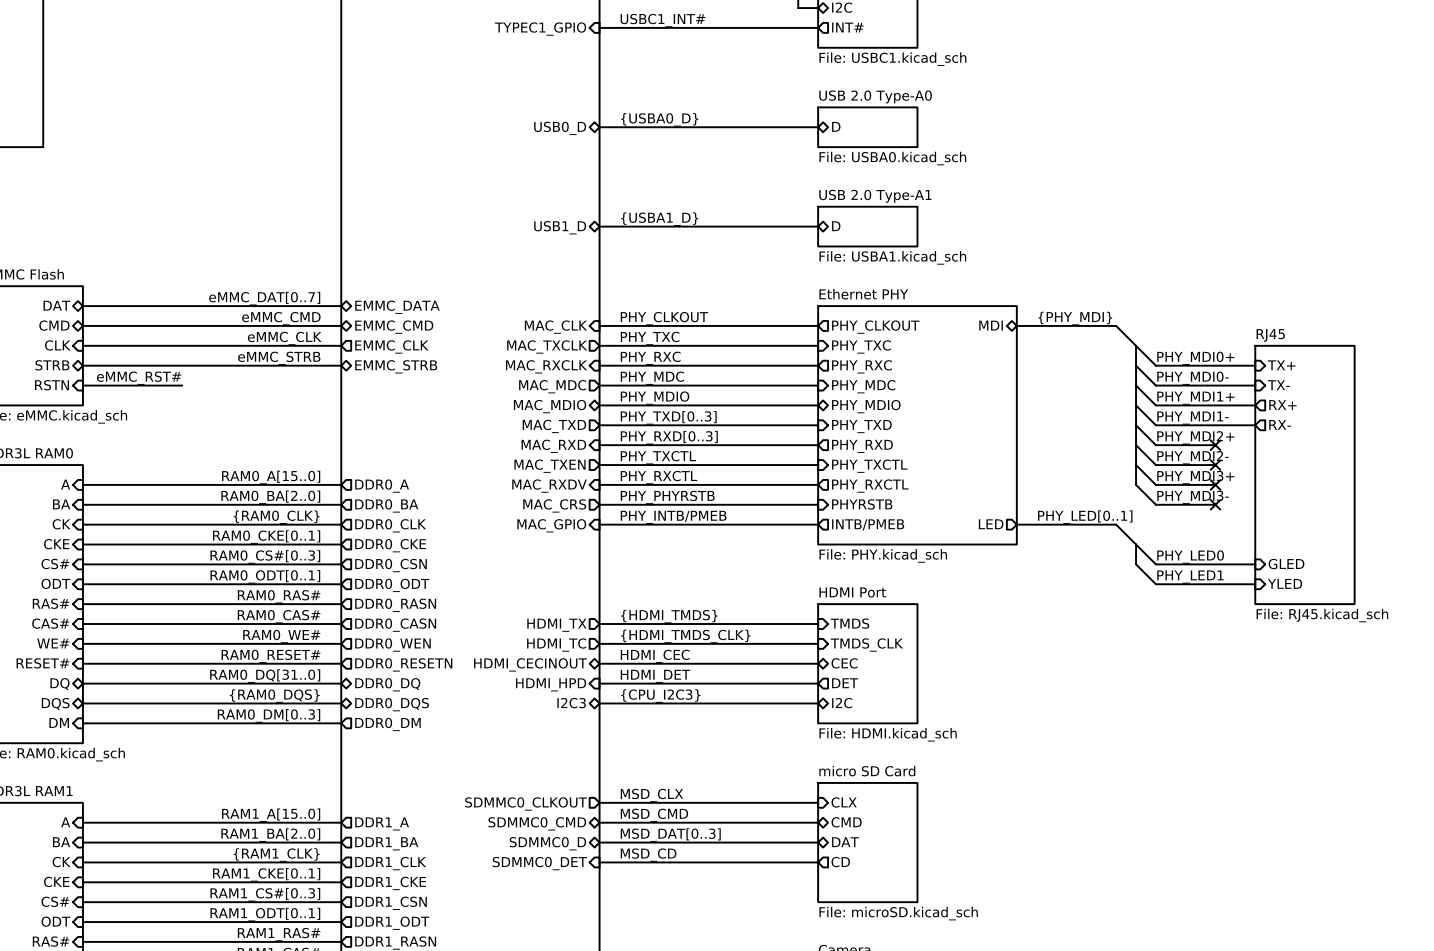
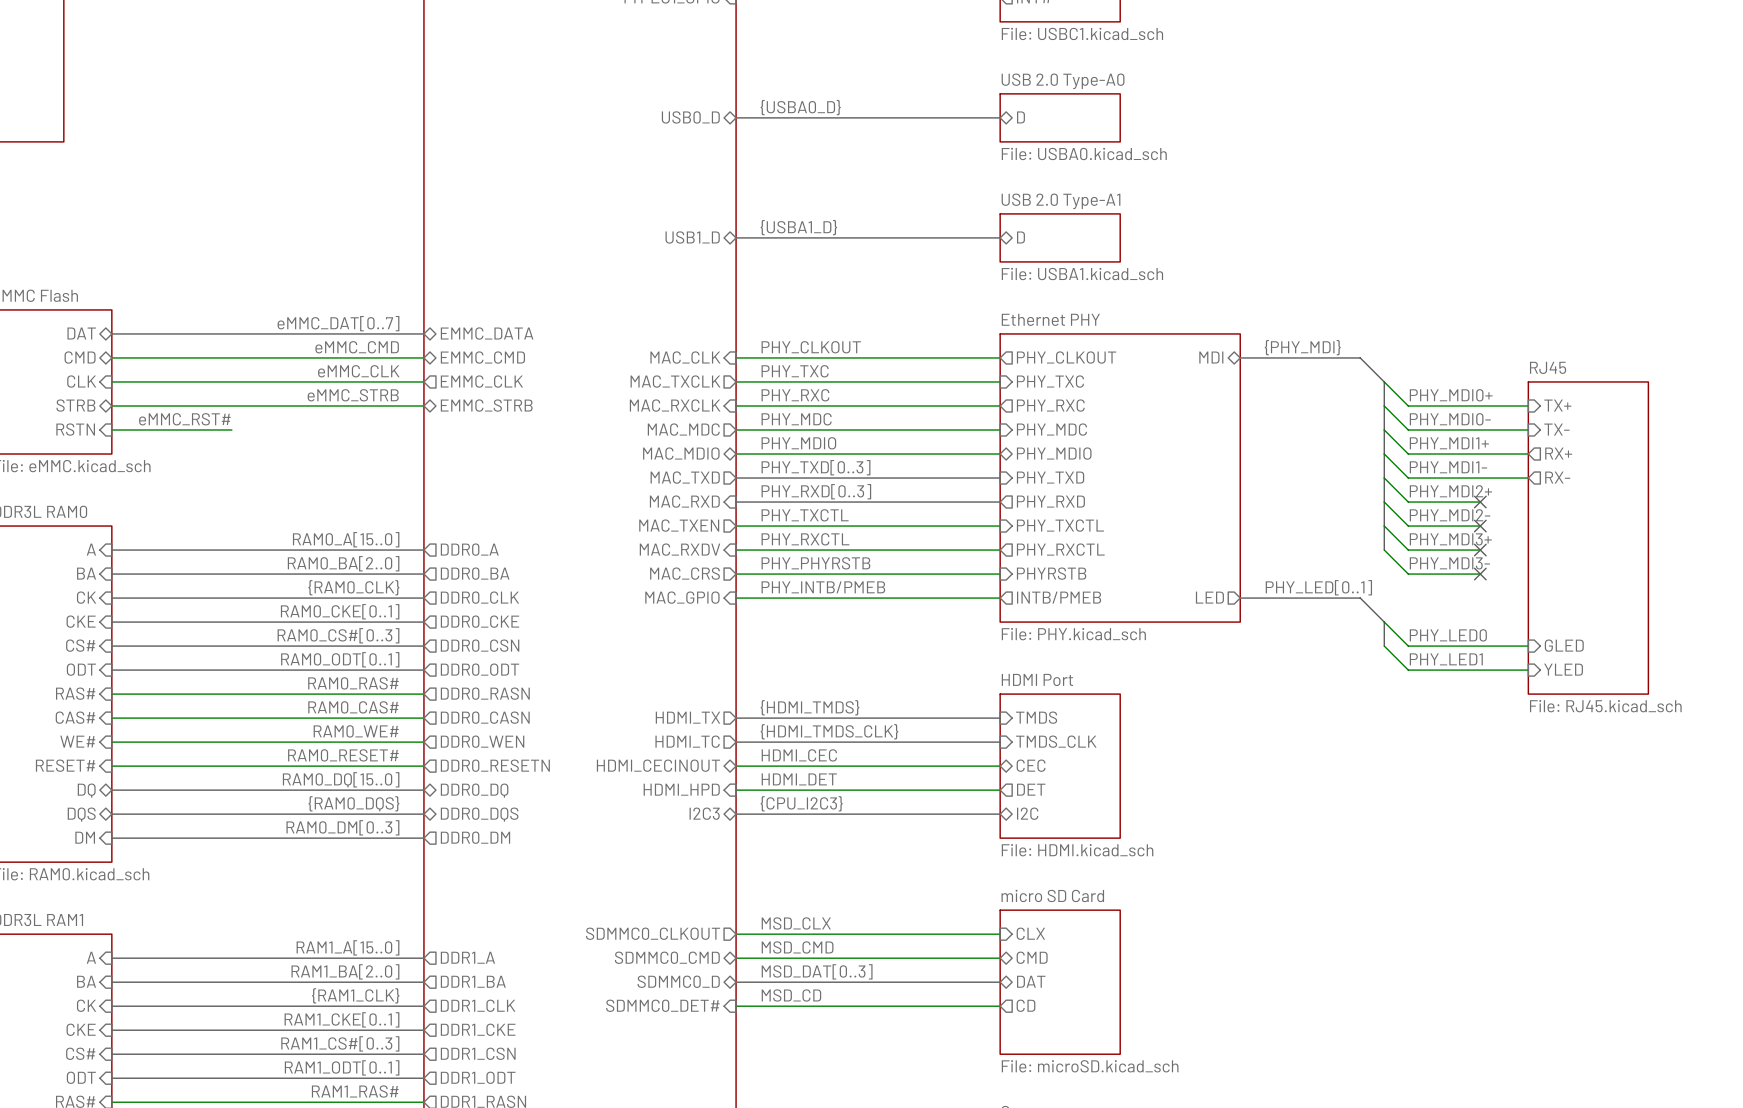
label: RAM0_DQ[31..0] (265, 676) -> RAM0_DQ[15..0] (341, 779)
sheet pin: SDMMC0_DET (539, 863) -> SDMMC0_DET# (662, 1005)

